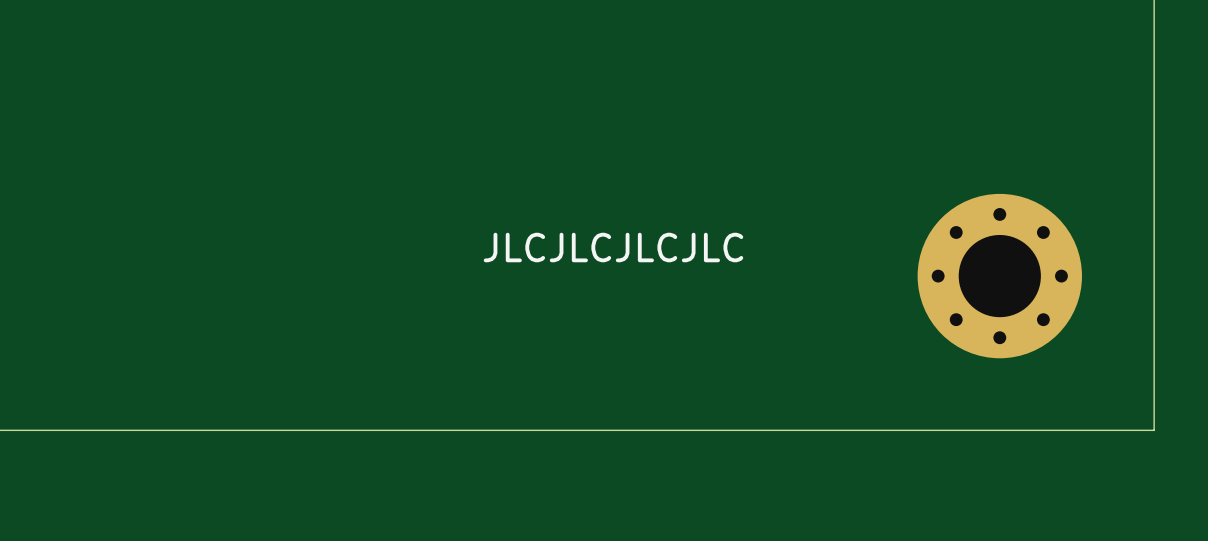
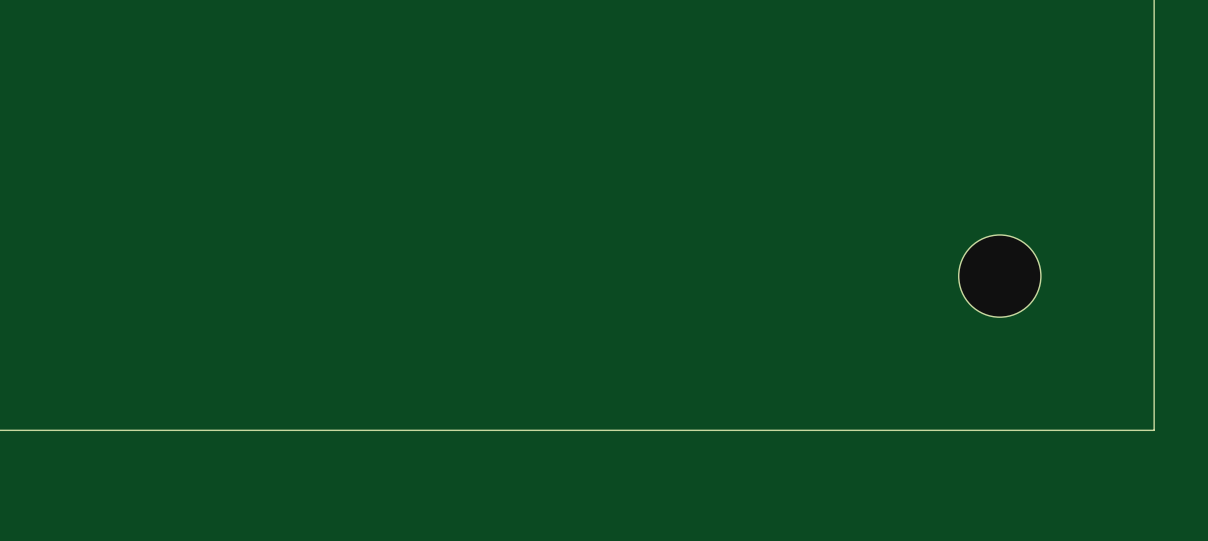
part footprint: [917, 193, 1083, 359] -> [958, 234, 1041, 318]
text: JLCJLCJLCJLC (613, 247) -> none

